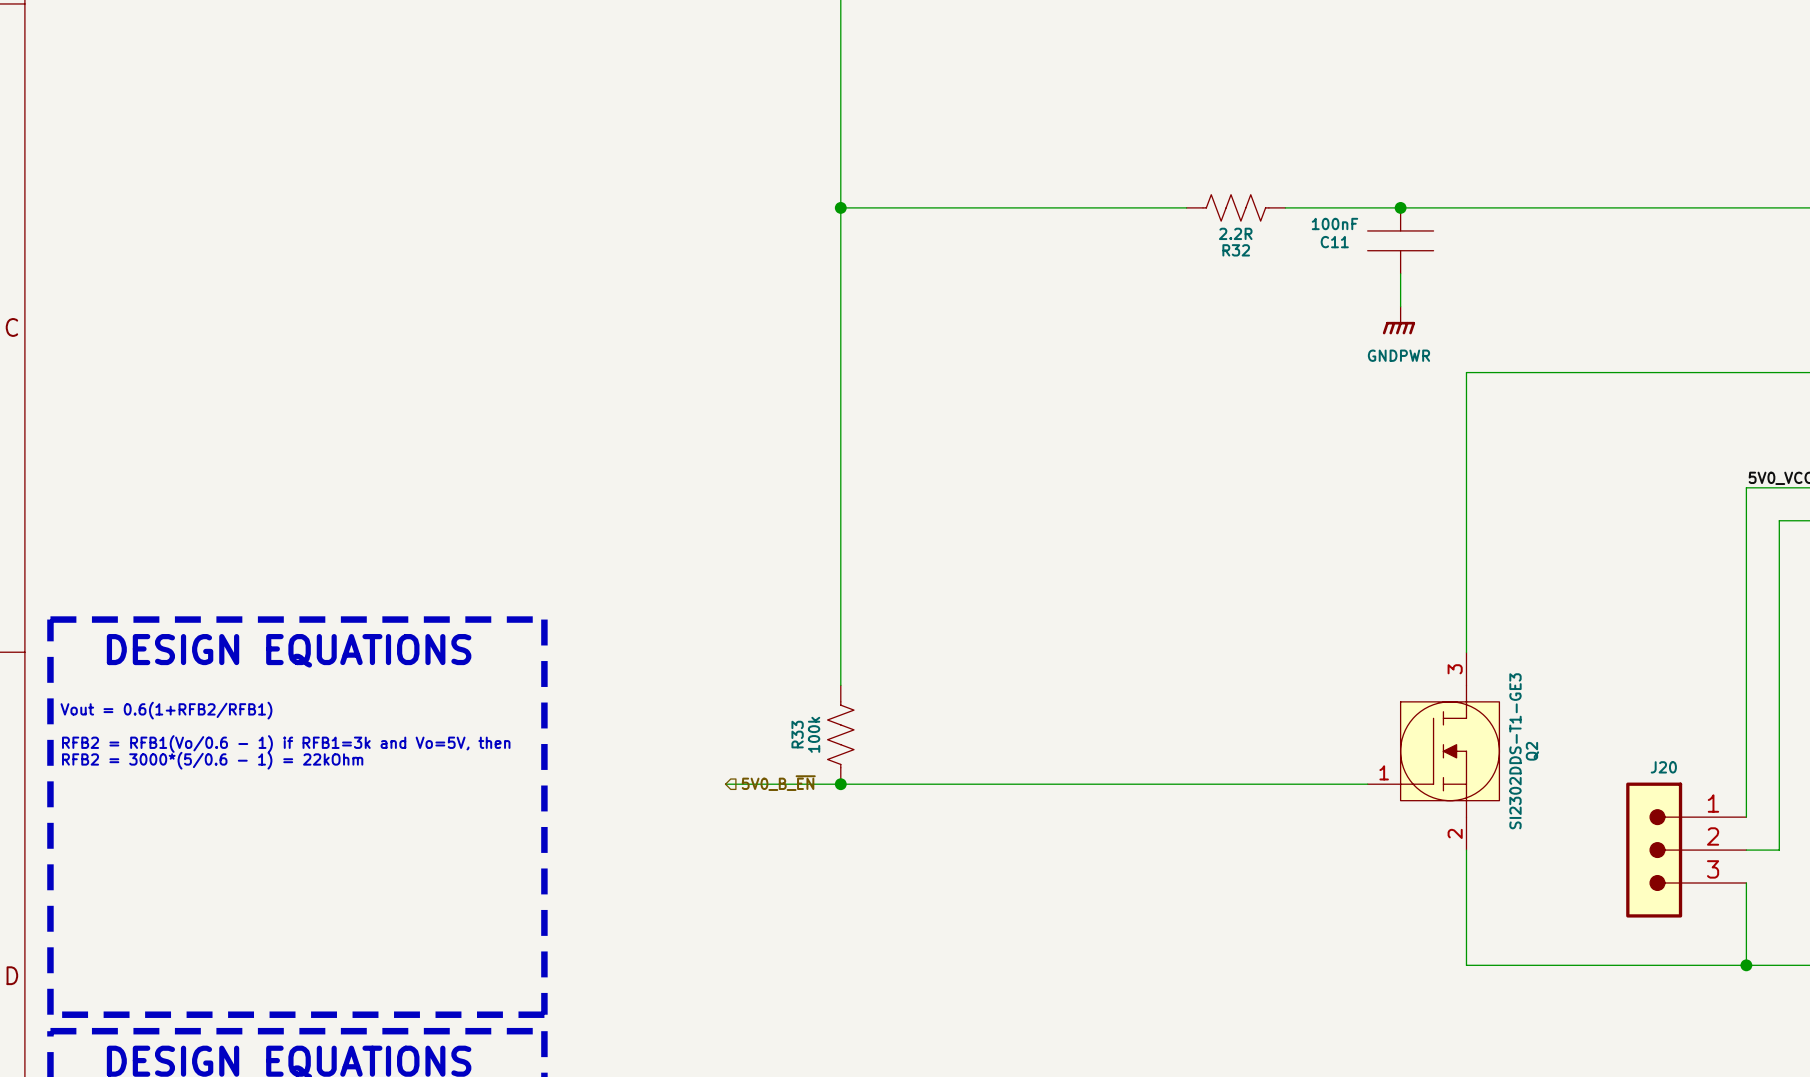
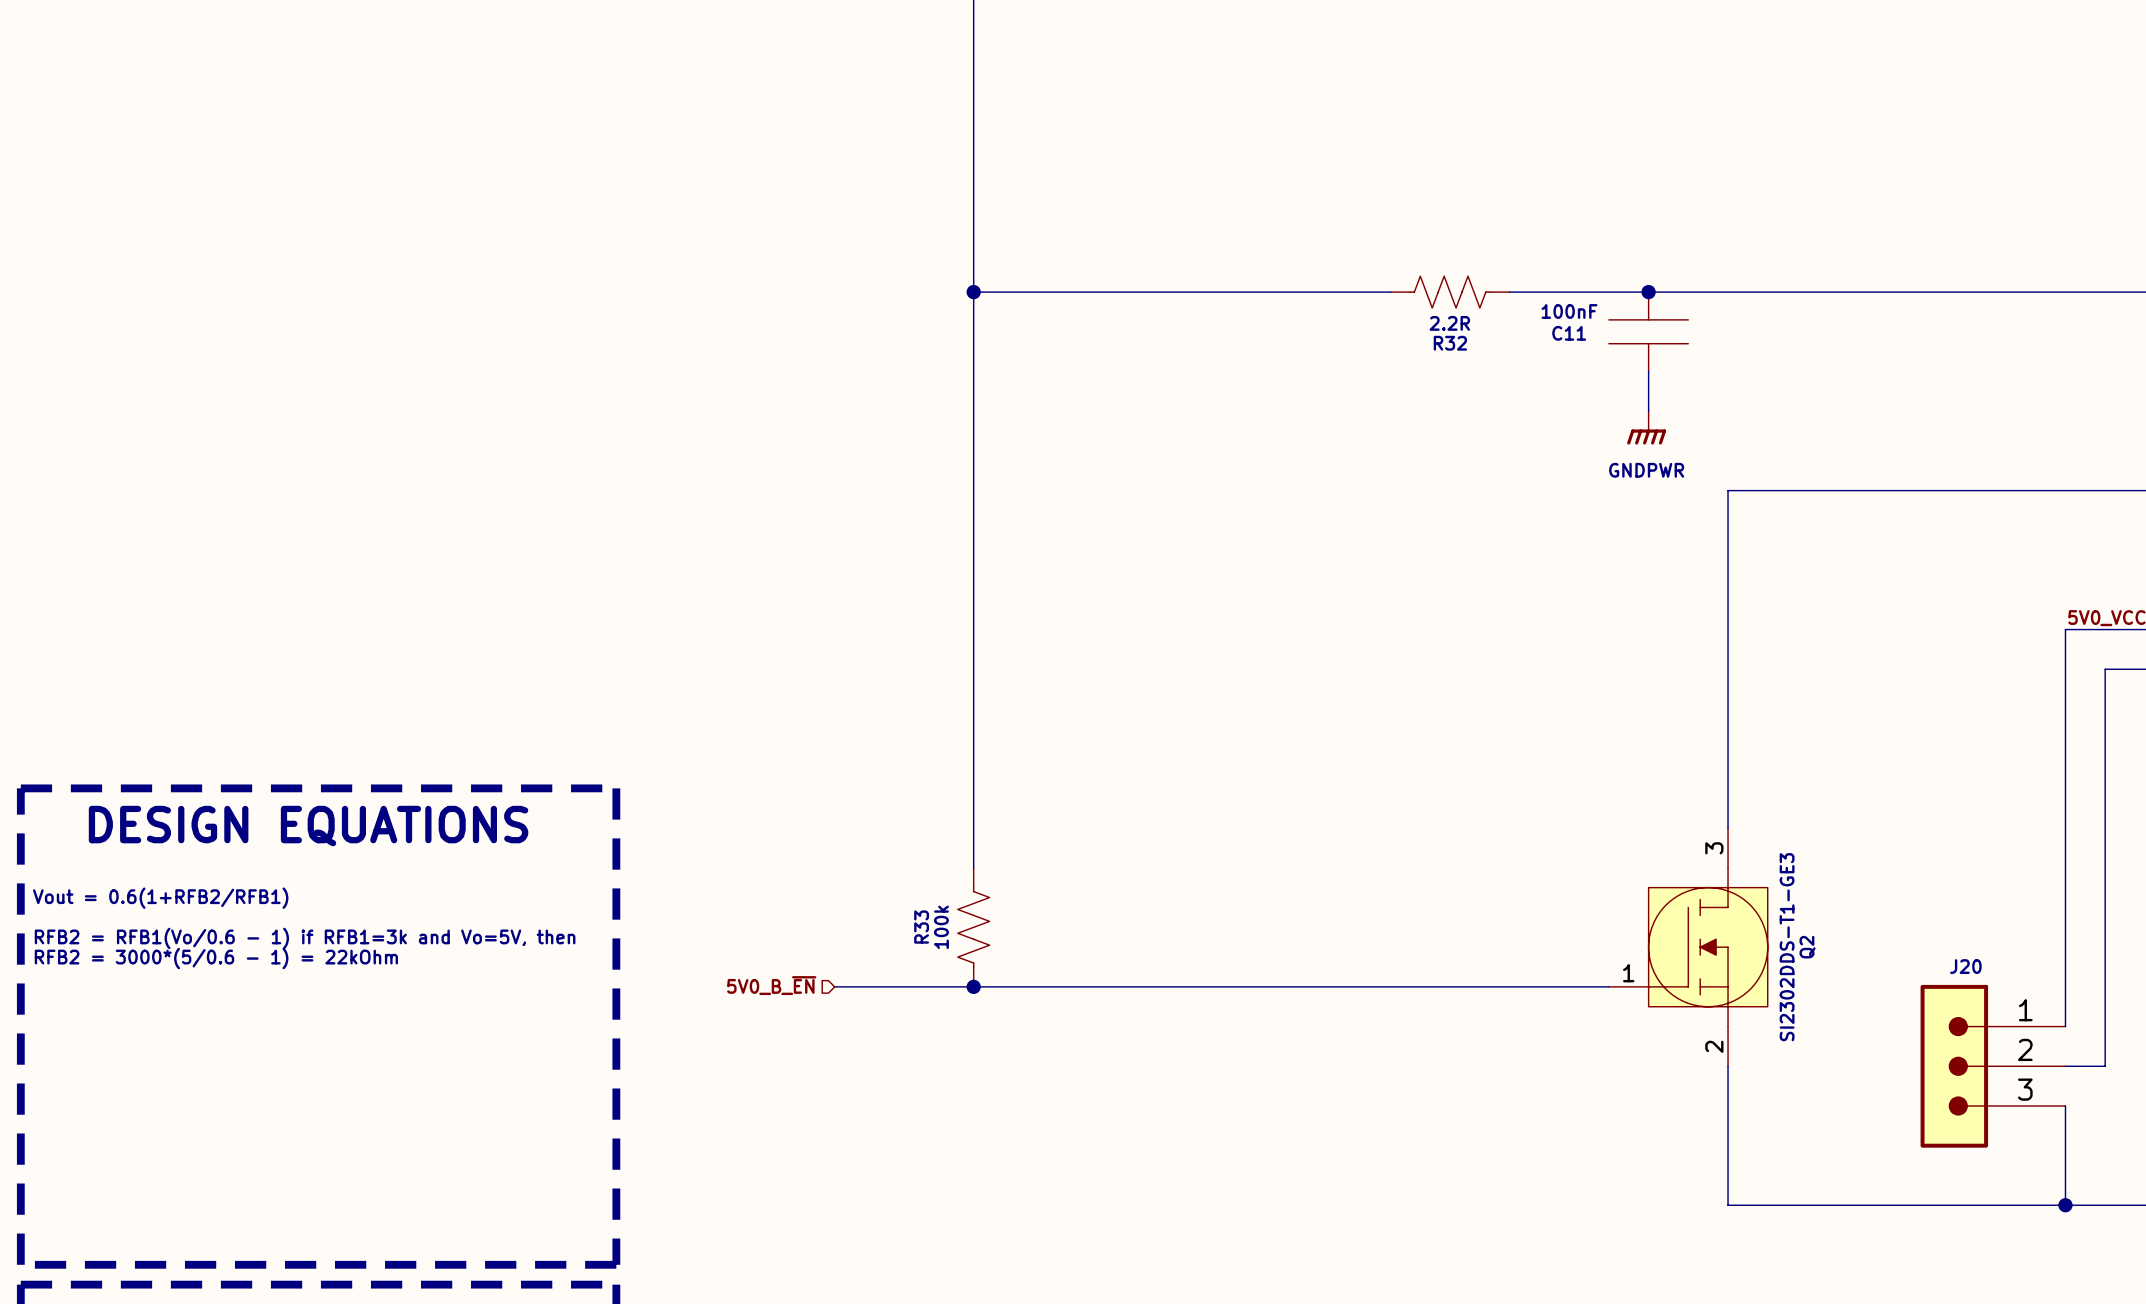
hierarchical label rotation: 0° (778, 783) -> 180° (771, 985)
hierarchical label position: 5V0_B_~{EN} (778, 783) -> 5V0_B_~{EN} (771, 985)

